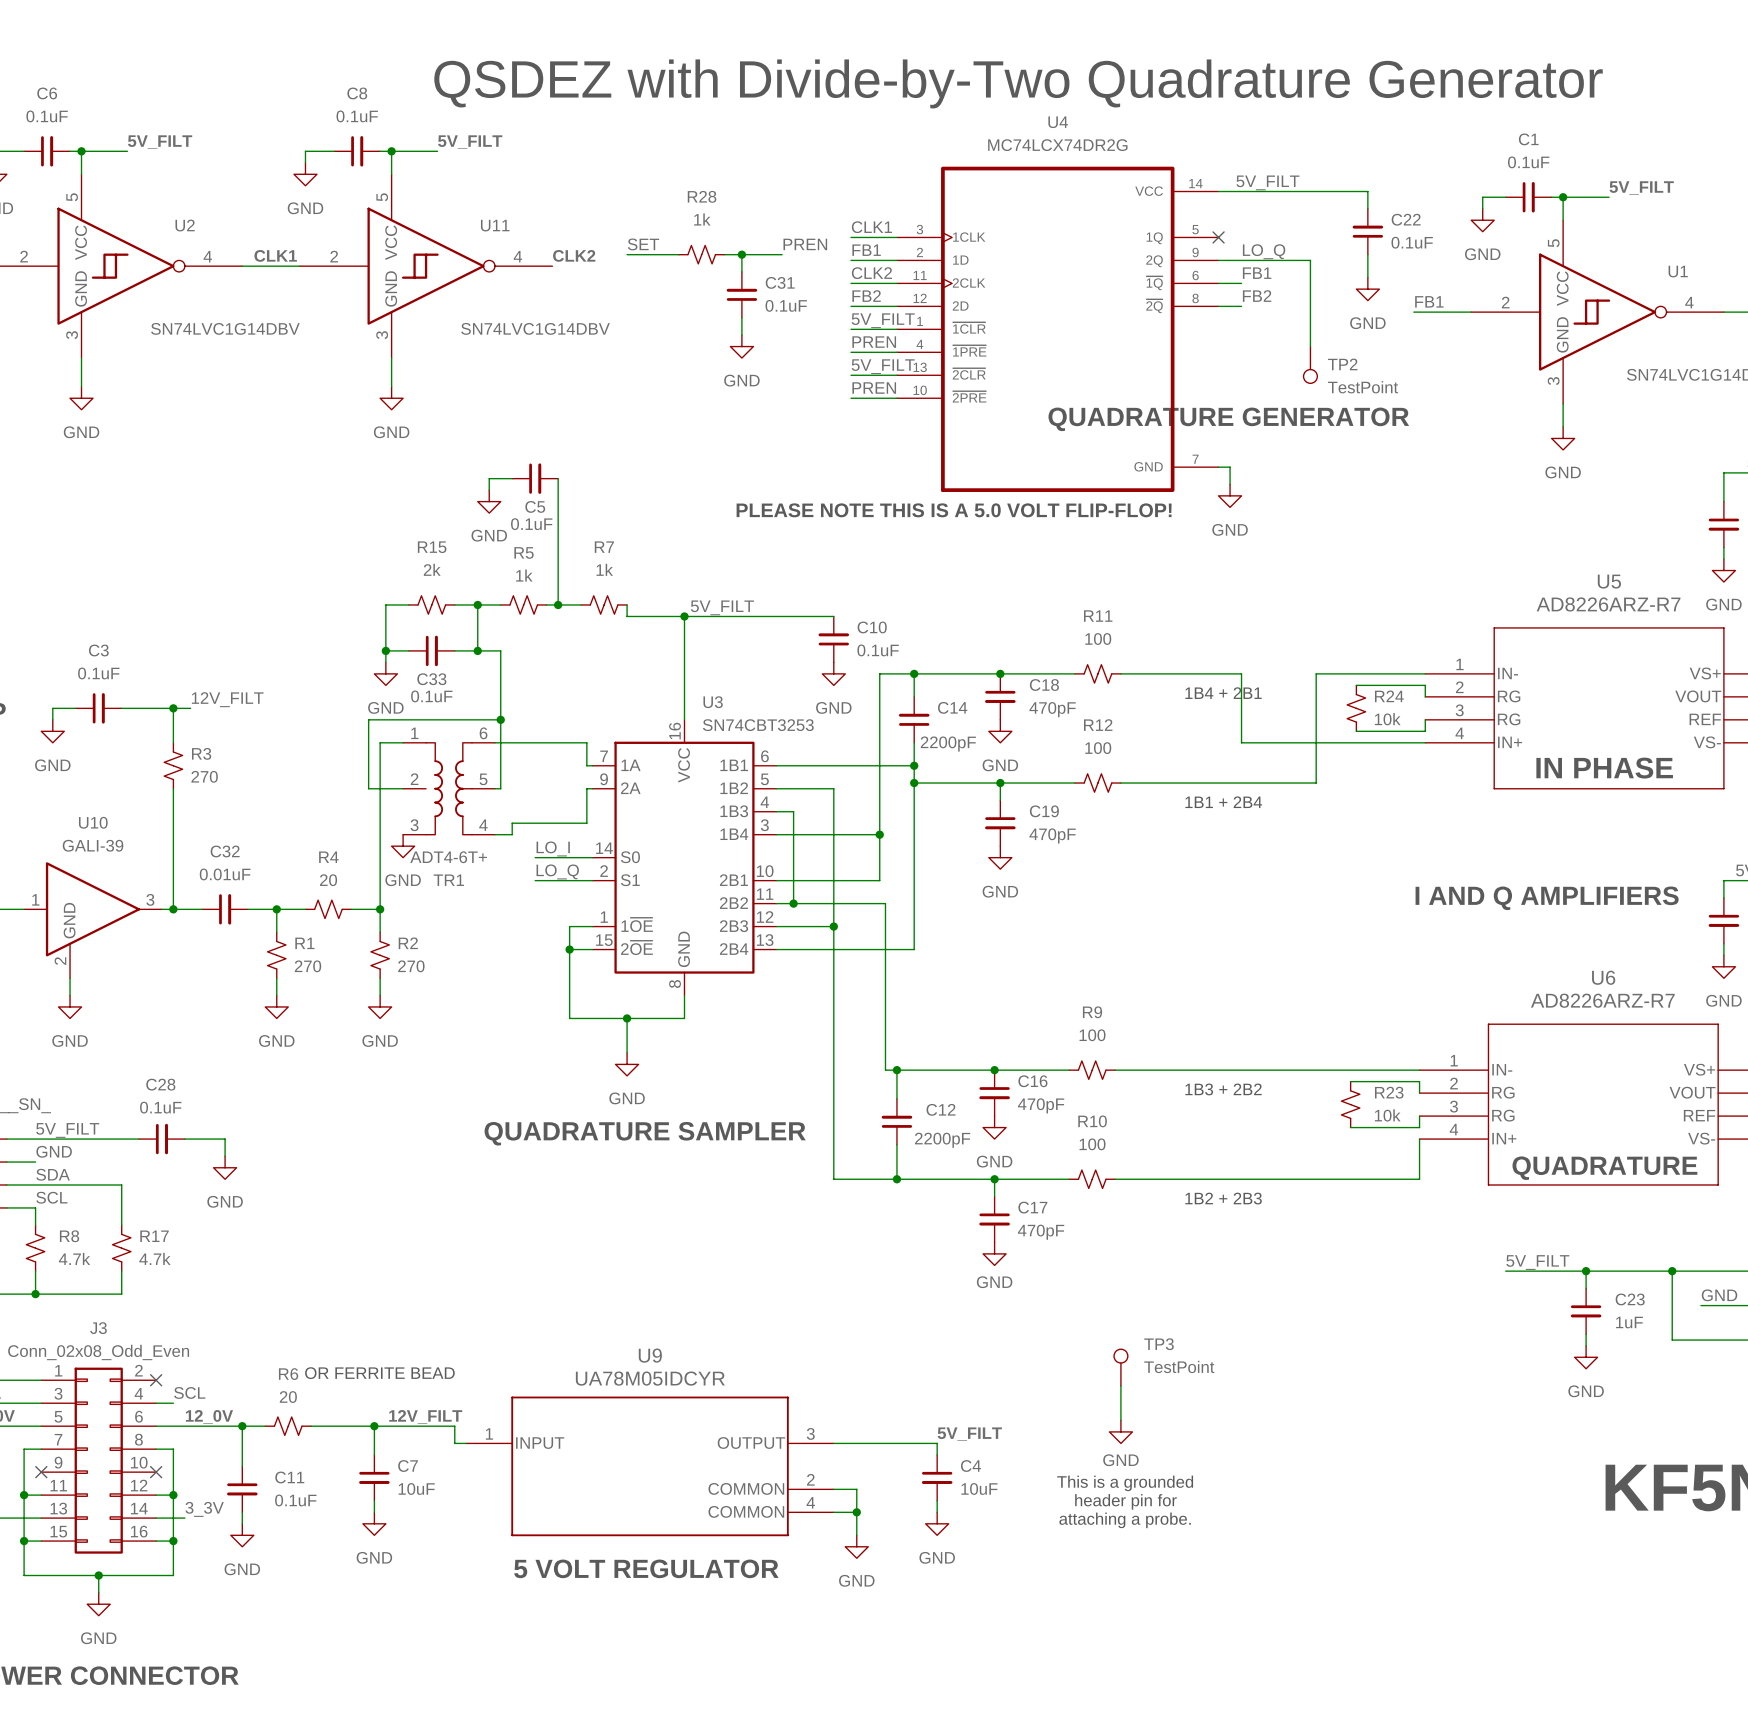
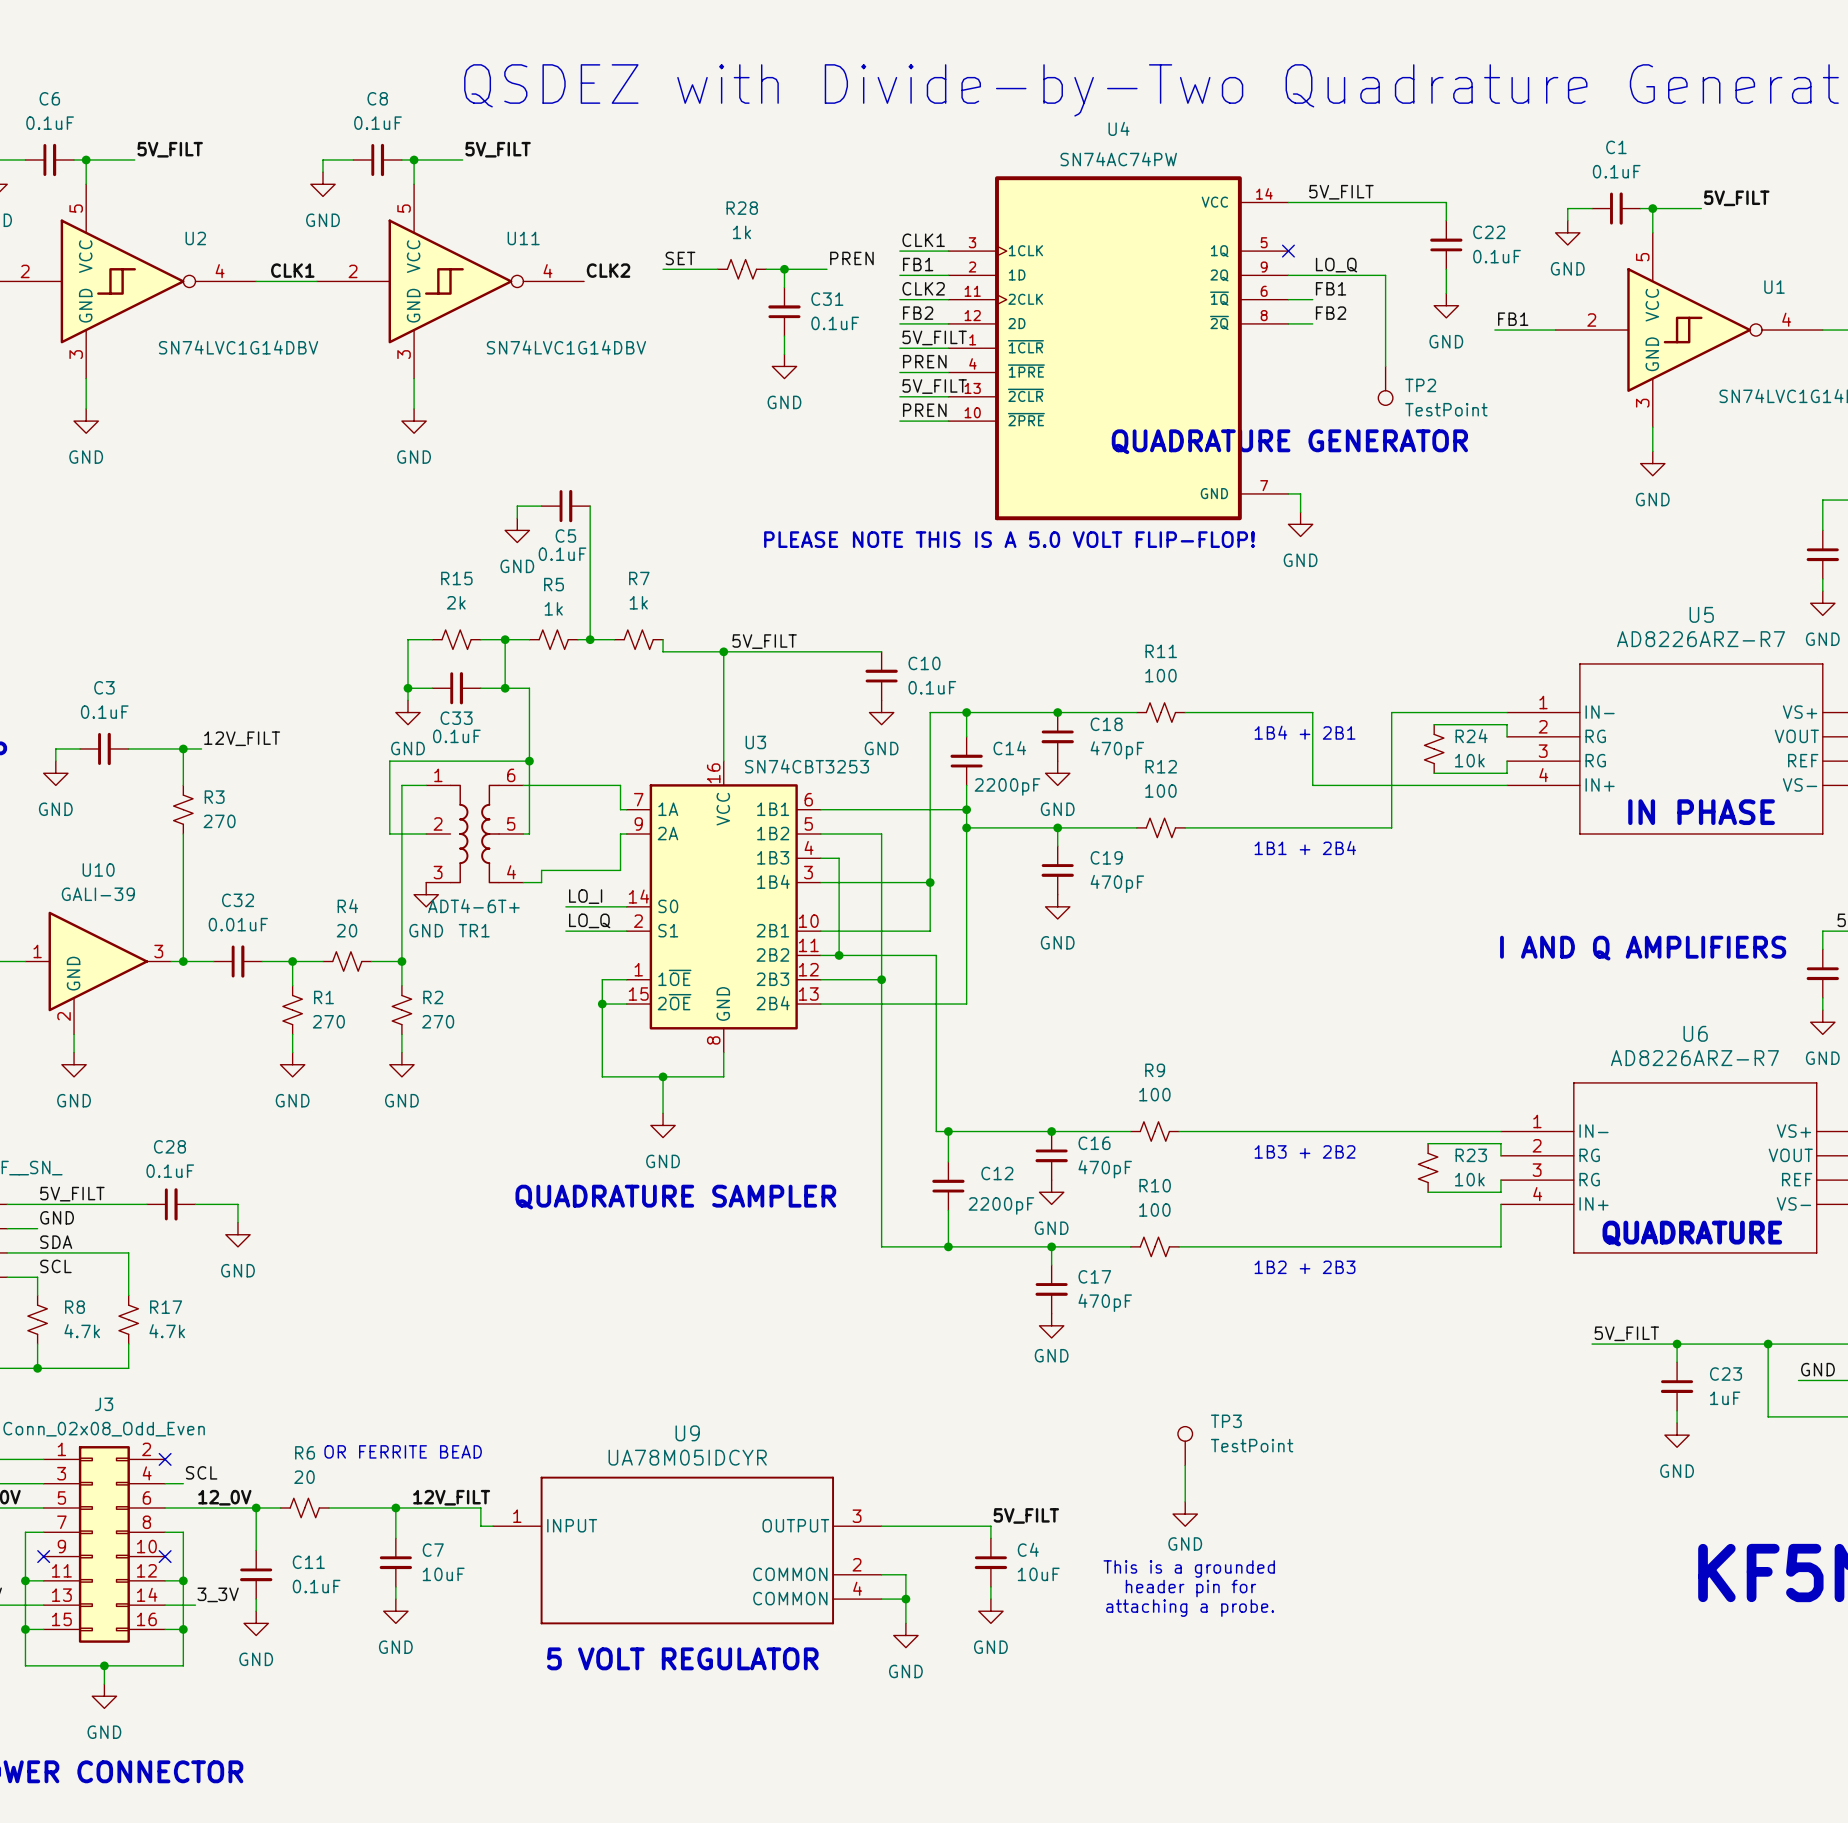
U4 value: MC74LCX74DR2G (1057, 145) -> SN74AC74PW (1118, 159)

